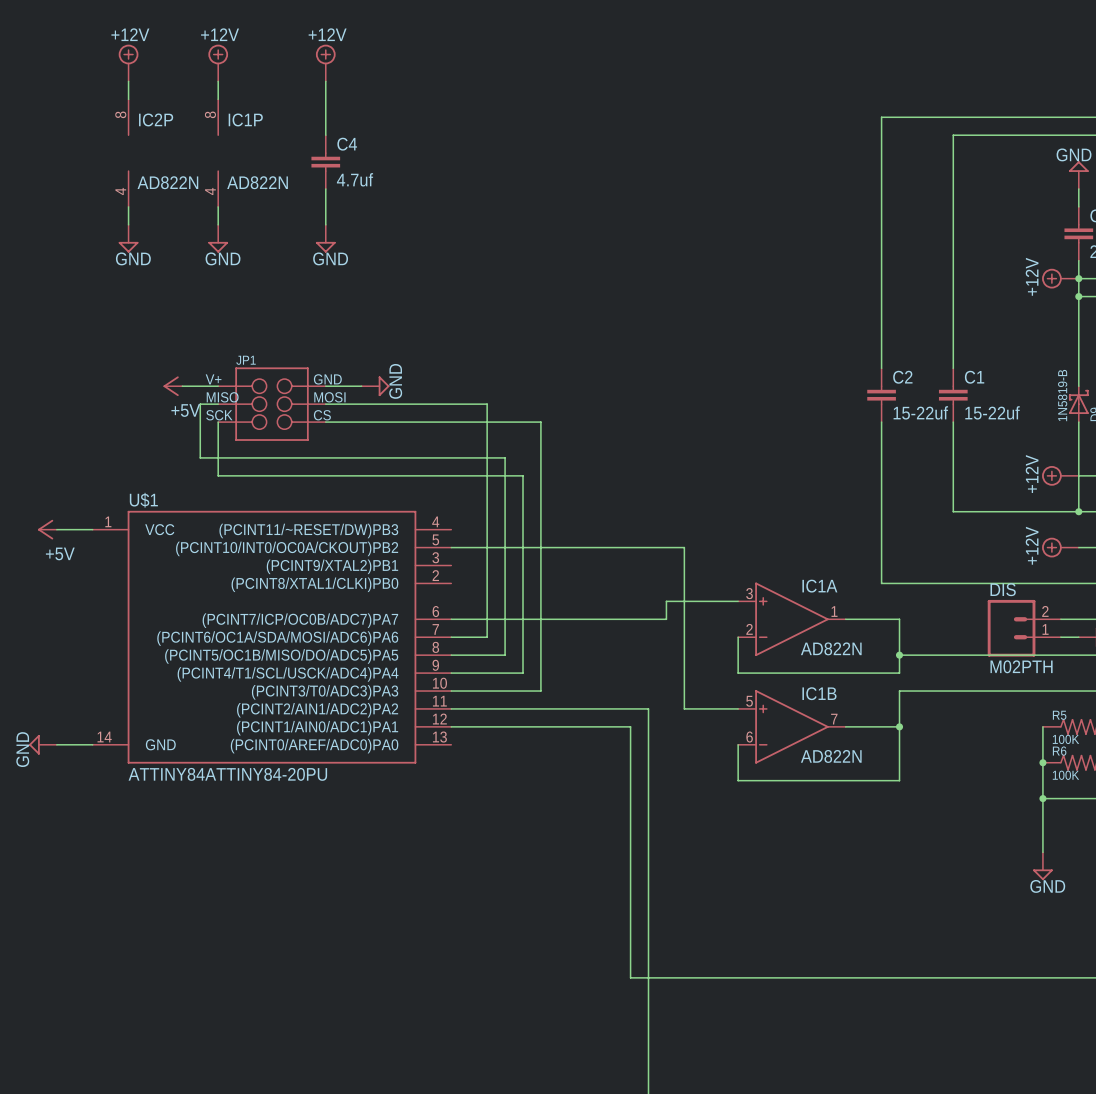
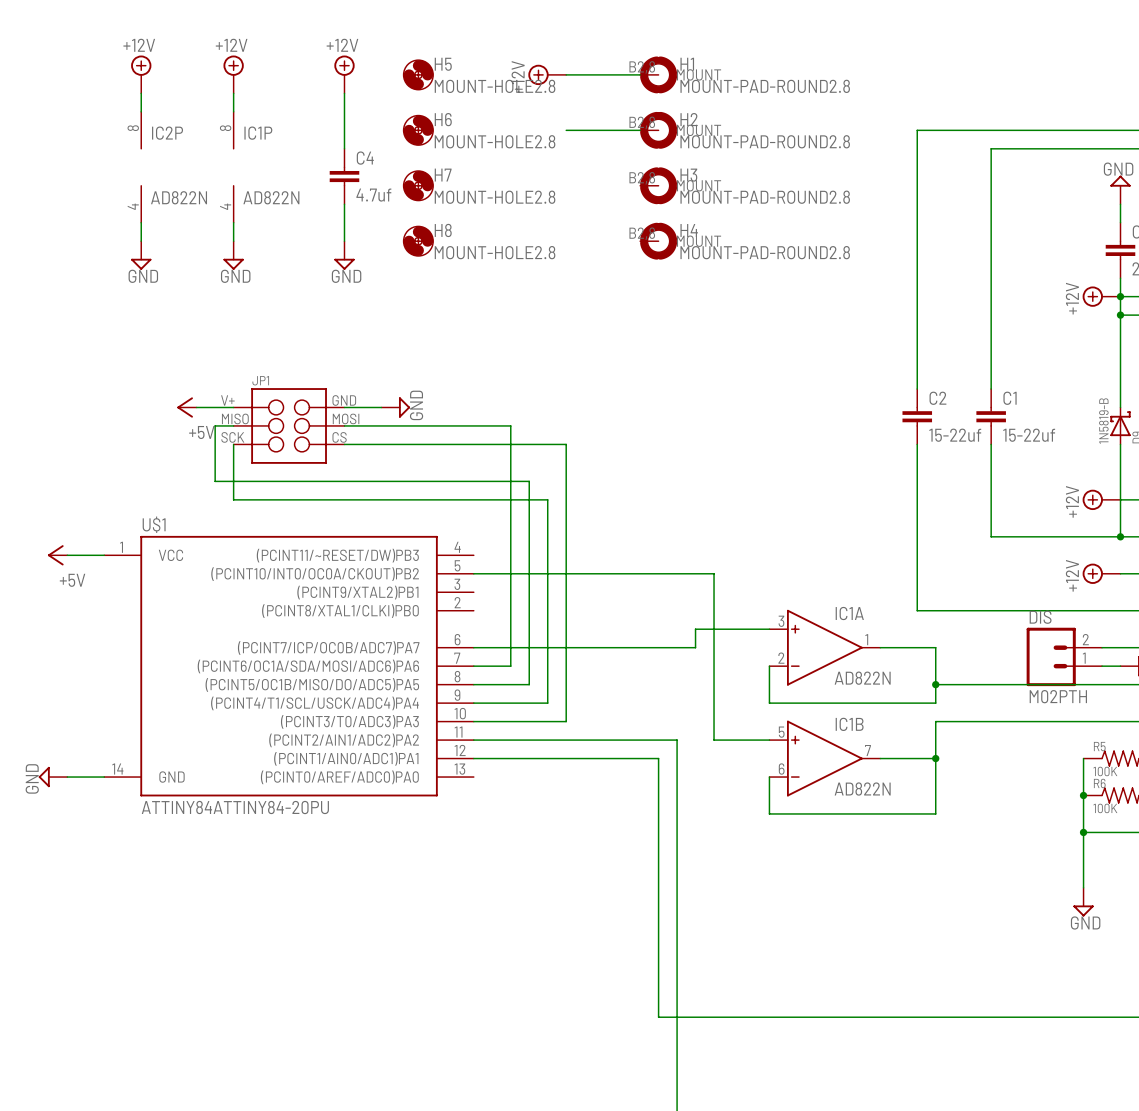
H5: none -> MOUNT-HOLE2.8 (418, 74)
power symbol: none -> +12V (547, 74)
wire: none -> (566, 74) (640, 74)
H1: none -> MOUNT-PAD-ROUND2.8 (658, 74)
H6: none -> MOUNT-HOLE2.8 (418, 130)
wire: none -> (566, 130) (640, 130)
H2: none -> MOUNT-PAD-ROUND2.8 (658, 130)
H7: none -> MOUNT-HOLE2.8 (418, 185)
H3: none -> MOUNT-PAD-ROUND2.8 (658, 185)
H8: none -> MOUNT-HOLE2.8 (418, 241)
H4: none -> MOUNT-PAD-ROUND2.8 (658, 241)

